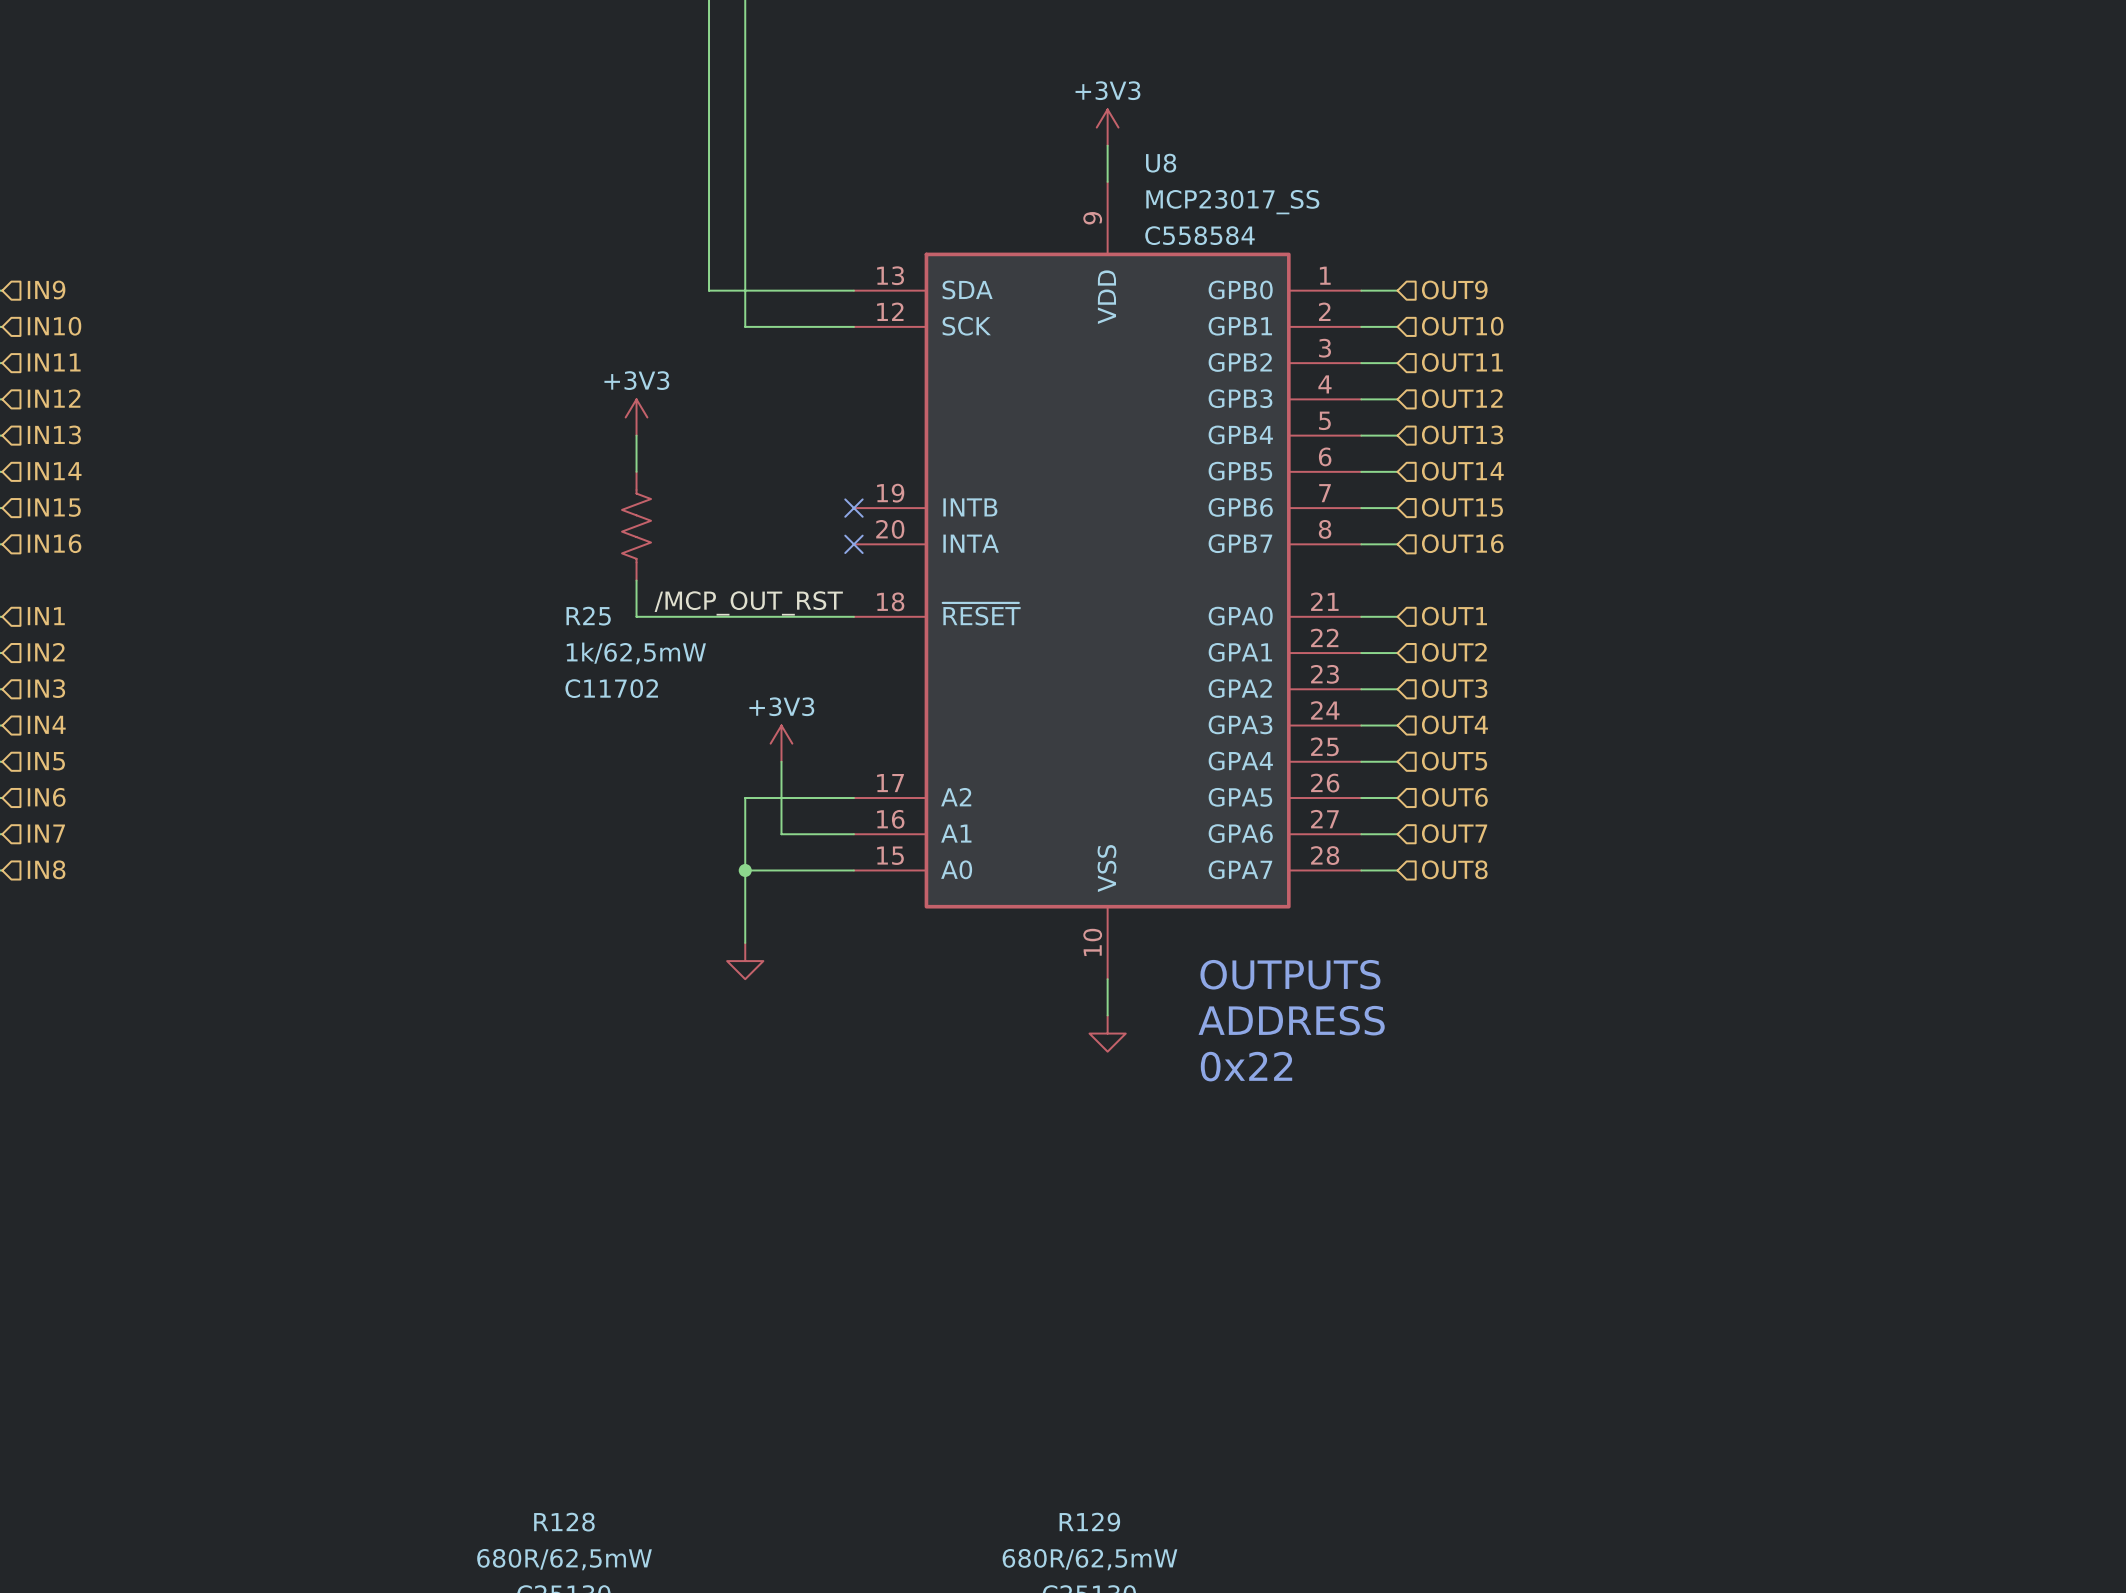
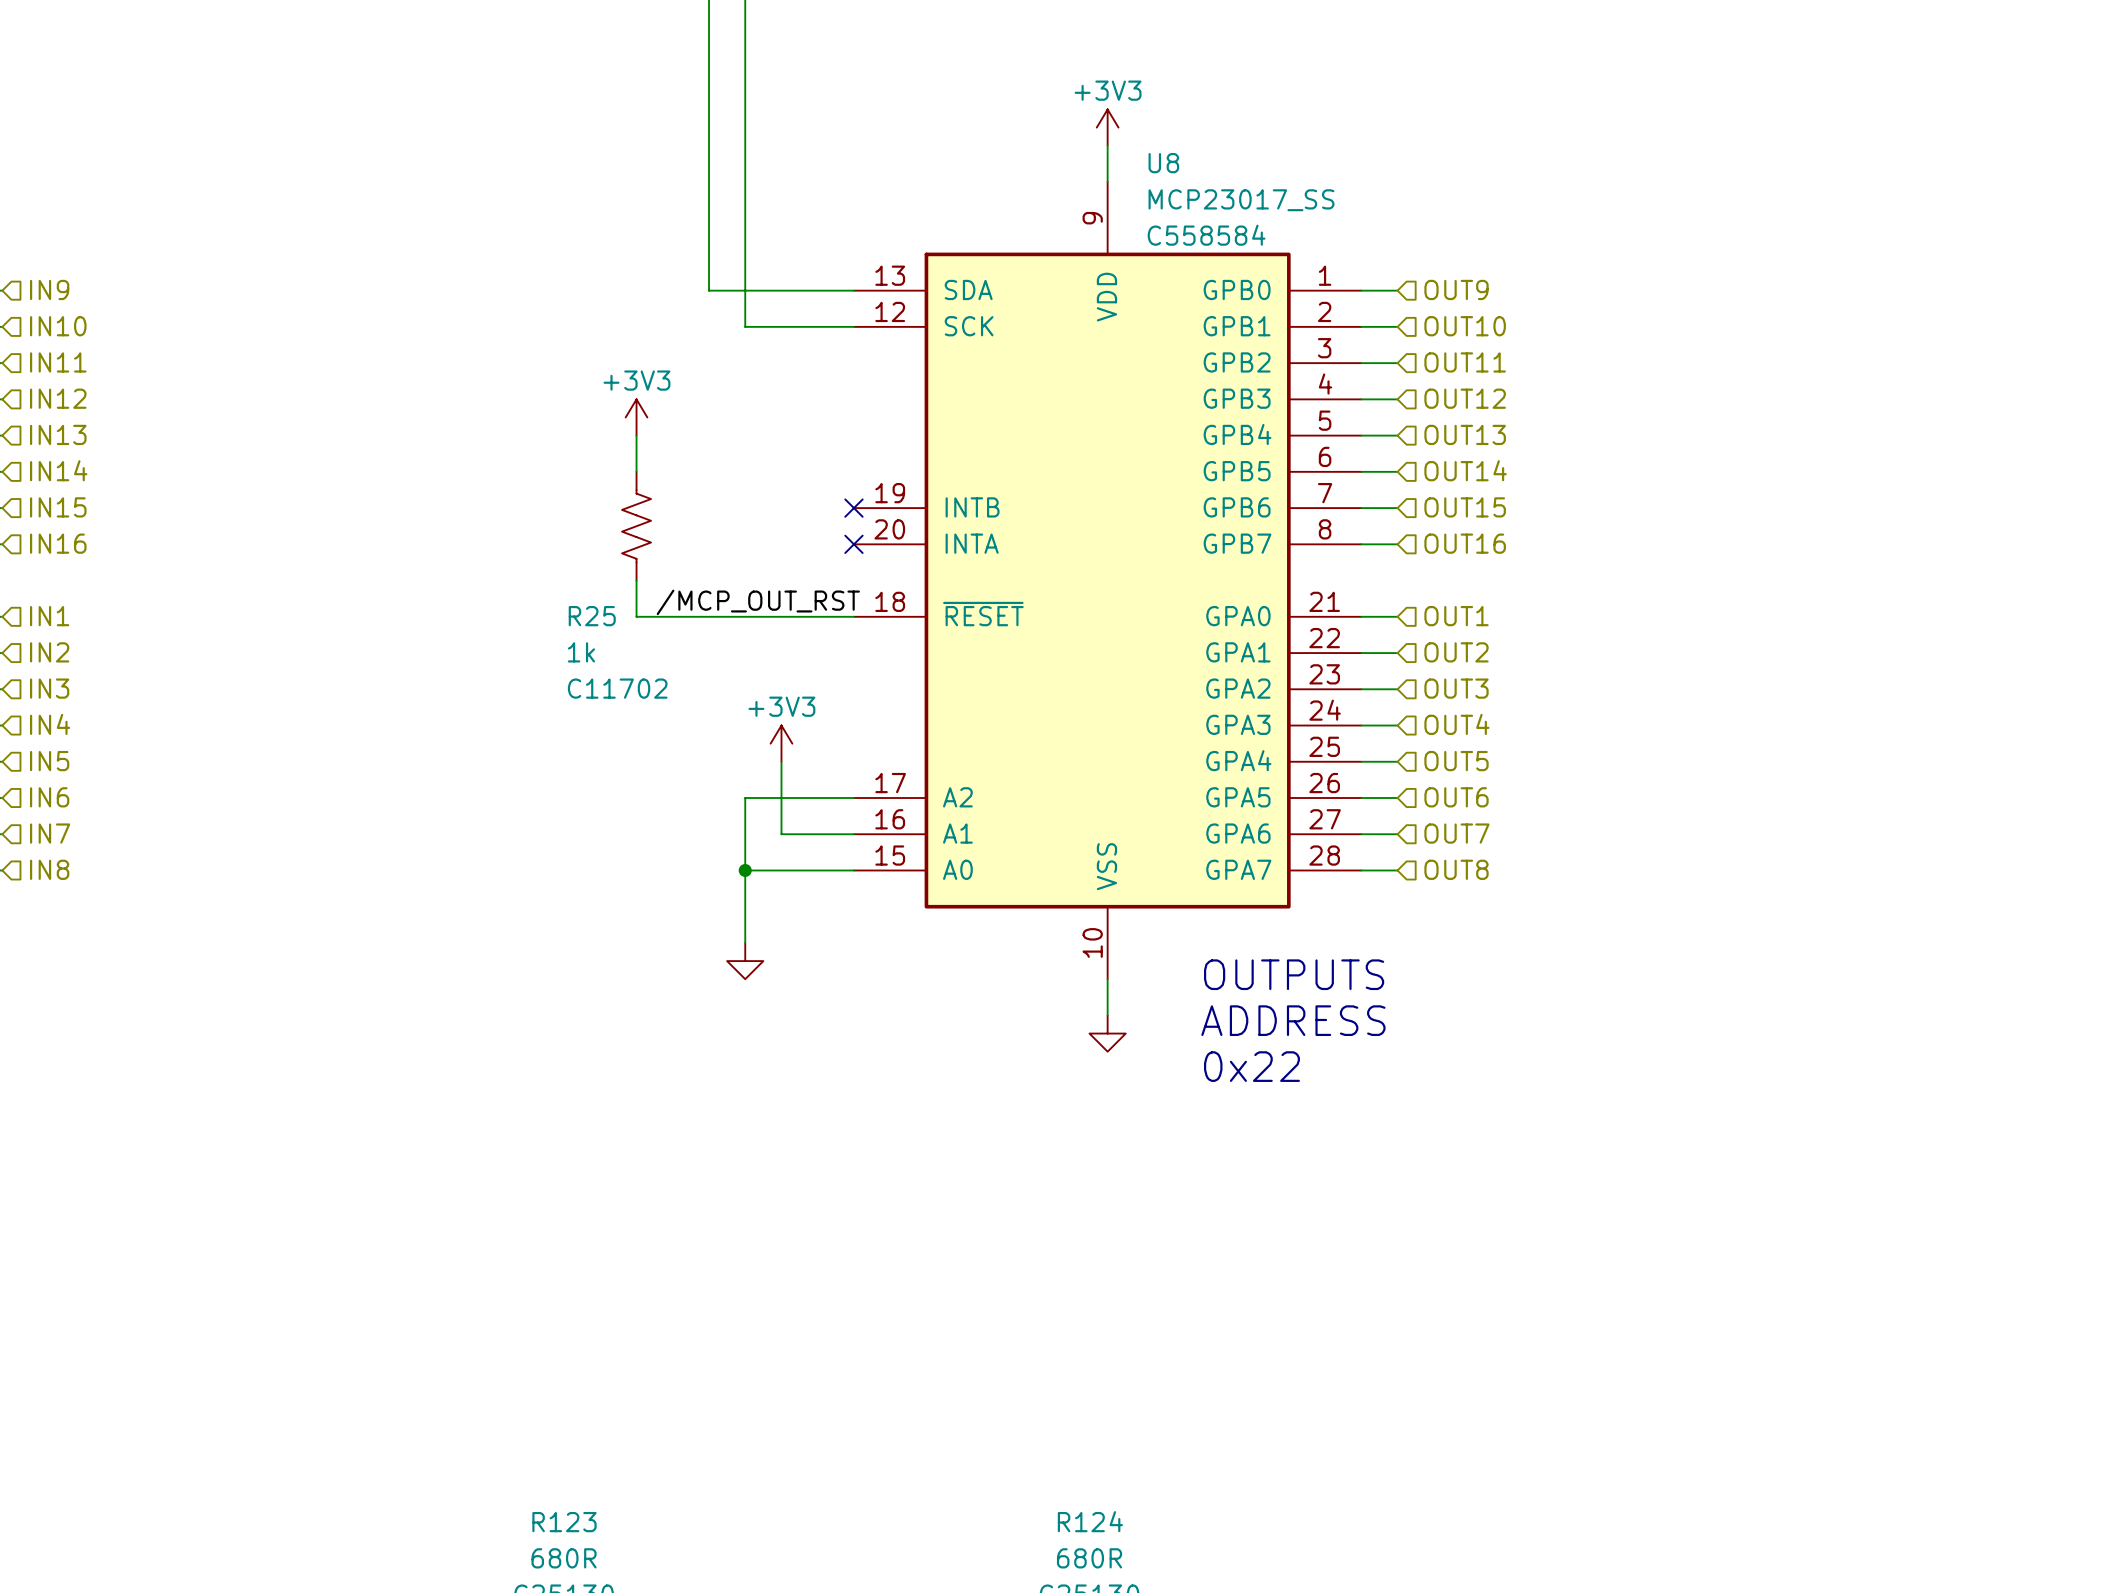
R25 value: 1k/62,5mW (636, 653) -> 1k (581, 652)
R128 name: R128 (564, 1522) -> R123 (564, 1522)
R129 name: R129 (1089, 1522) -> R124 (1090, 1521)
R128 value: 680R/62,5mW (564, 1559) -> 680R (564, 1558)
R129 value: 680R/62,5mW (1089, 1559) -> 680R (1089, 1558)

